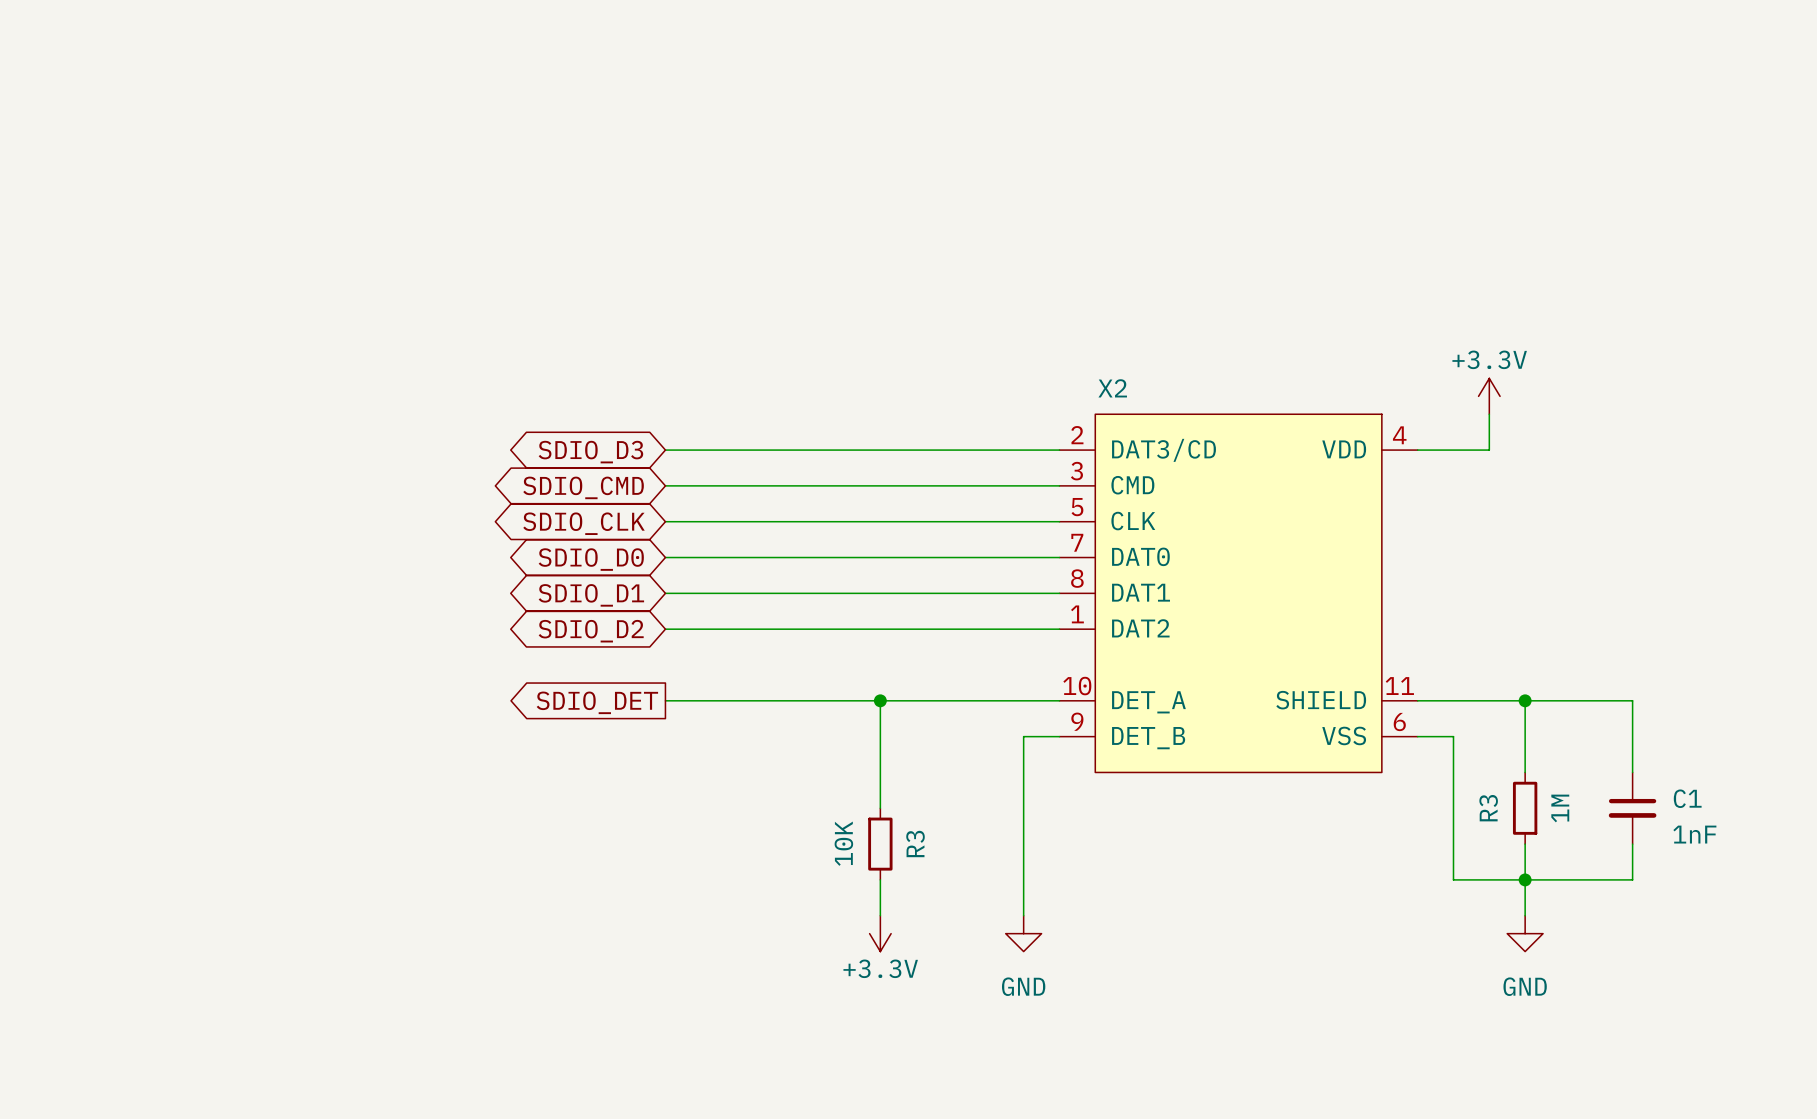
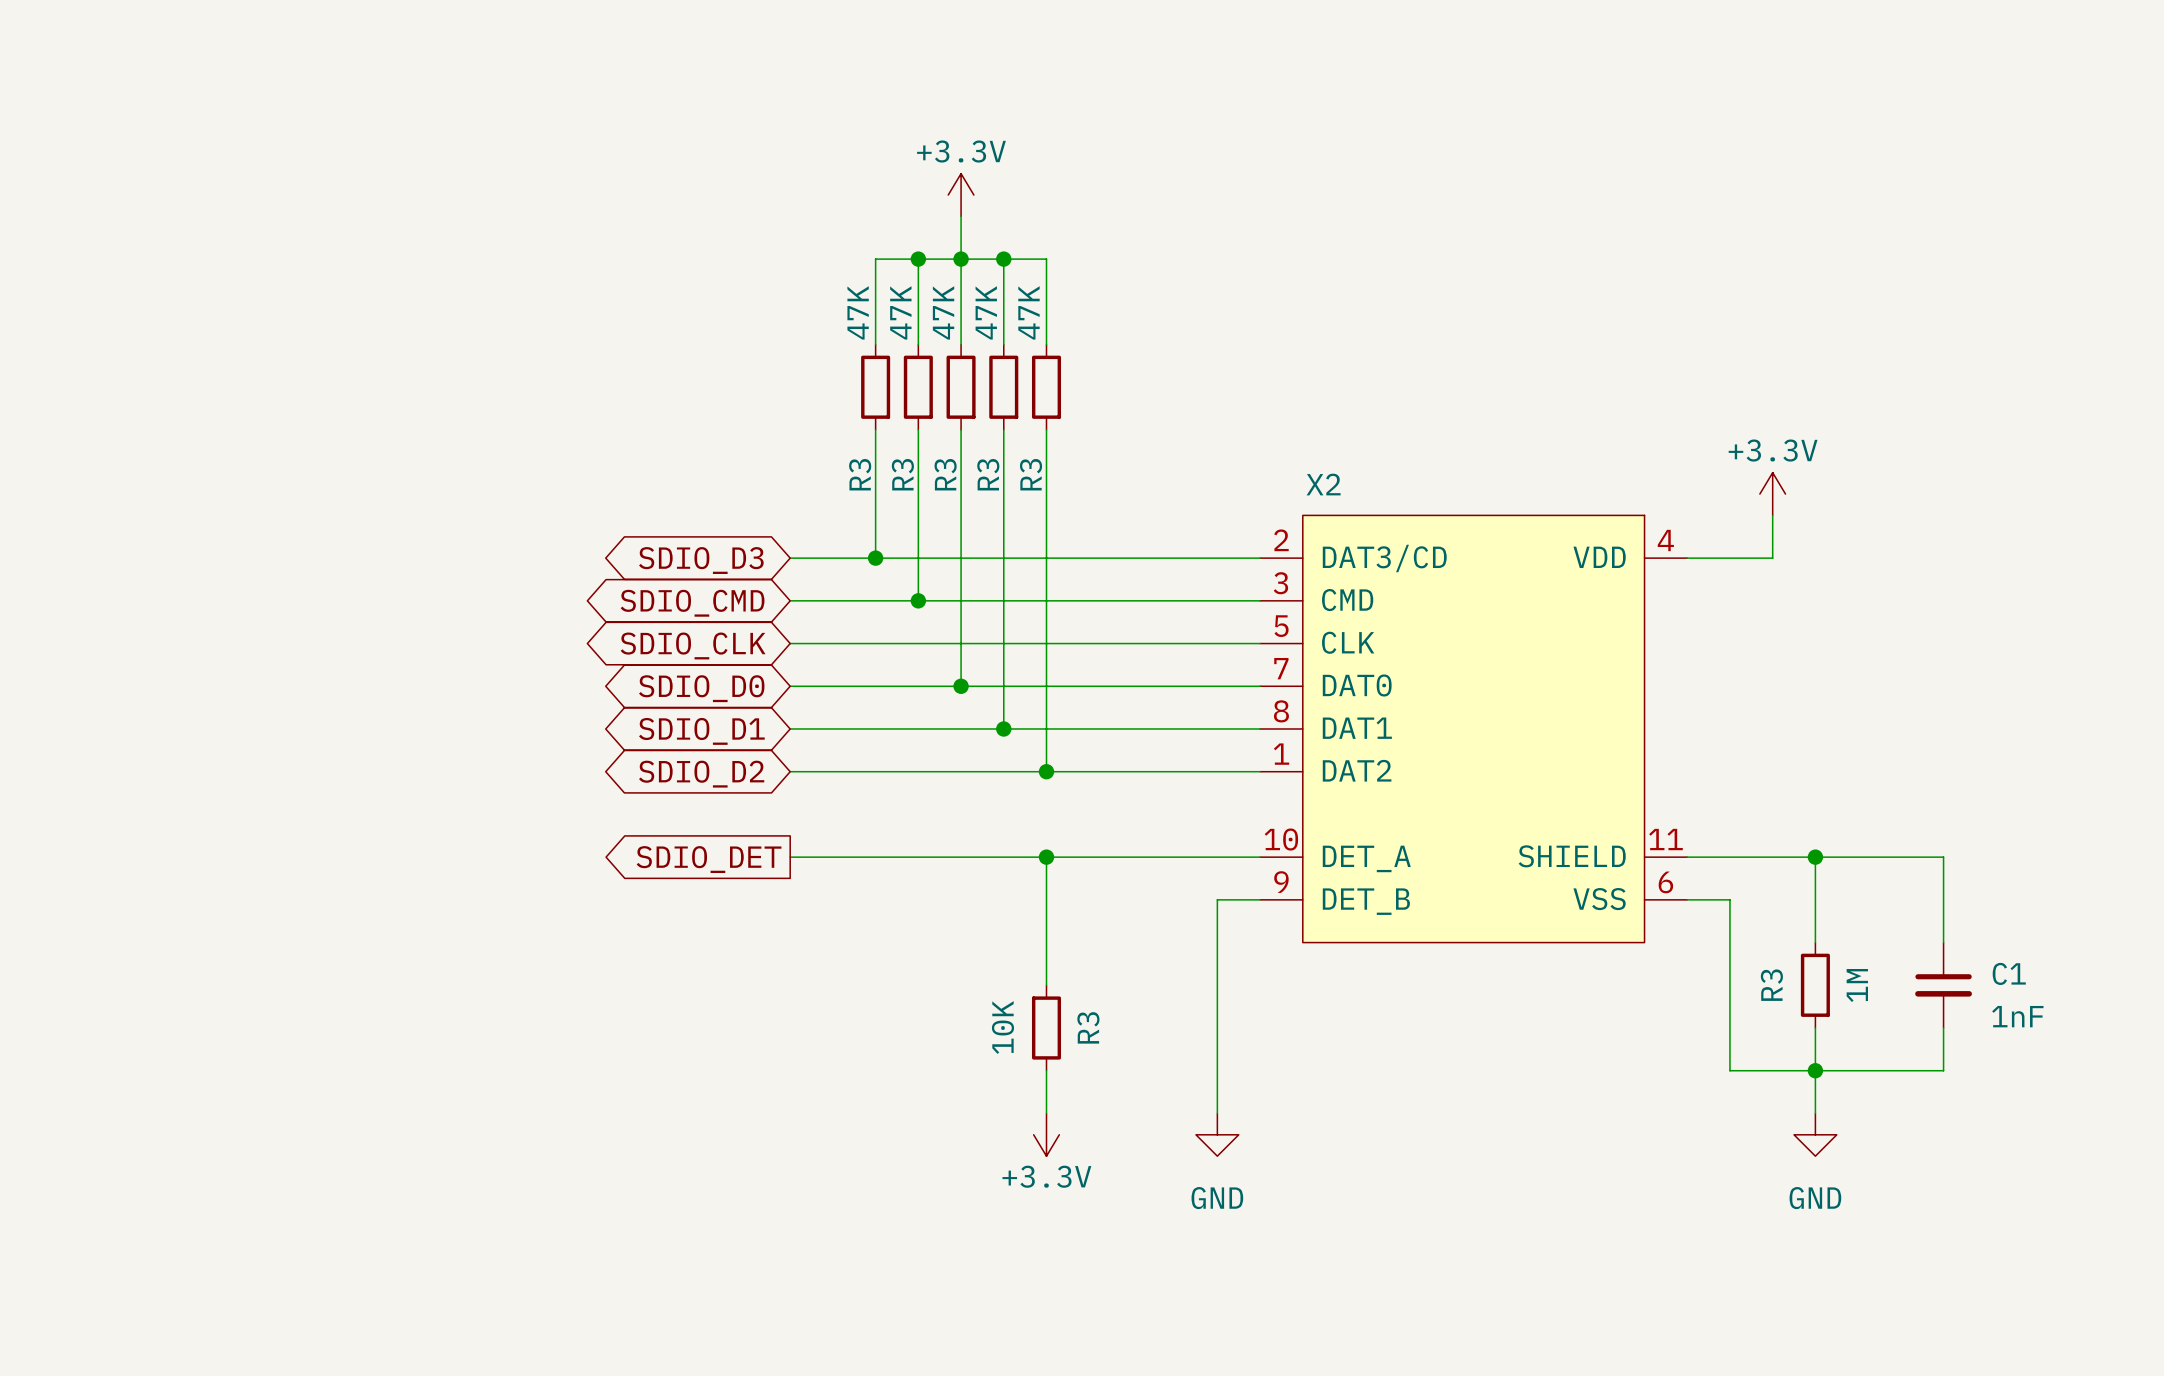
power symbol: none -> +3.3V (961, 195)
wire: none -> (961, 216) (961, 344)
wire: none -> (918, 259) (918, 344)
junction: none -> (918, 259)
junction: none -> (961, 259)
wire: none -> (1003, 259) (1003, 344)
junction: none -> (1003, 259)
wire: none -> (875, 344) (875, 259) (1046, 259) (1046, 344)
R3: none -> 47K (875, 387)
R3: none -> 47K (918, 387)
R3: none -> 47K (961, 387)
R3: none -> 47K (1003, 387)
R3: none -> 47K (1046, 387)
wire: none -> (875, 429) (875, 558)
wire: none -> (918, 429) (918, 600)
wire: none -> (961, 429) (961, 686)
wire: none -> (1003, 429) (1003, 728)
wire: none -> (1046, 429) (1046, 771)
junction: none -> (875, 558)
junction: none -> (918, 600)
junction: none -> (961, 686)
junction: none -> (1003, 728)
junction: none -> (1046, 771)

